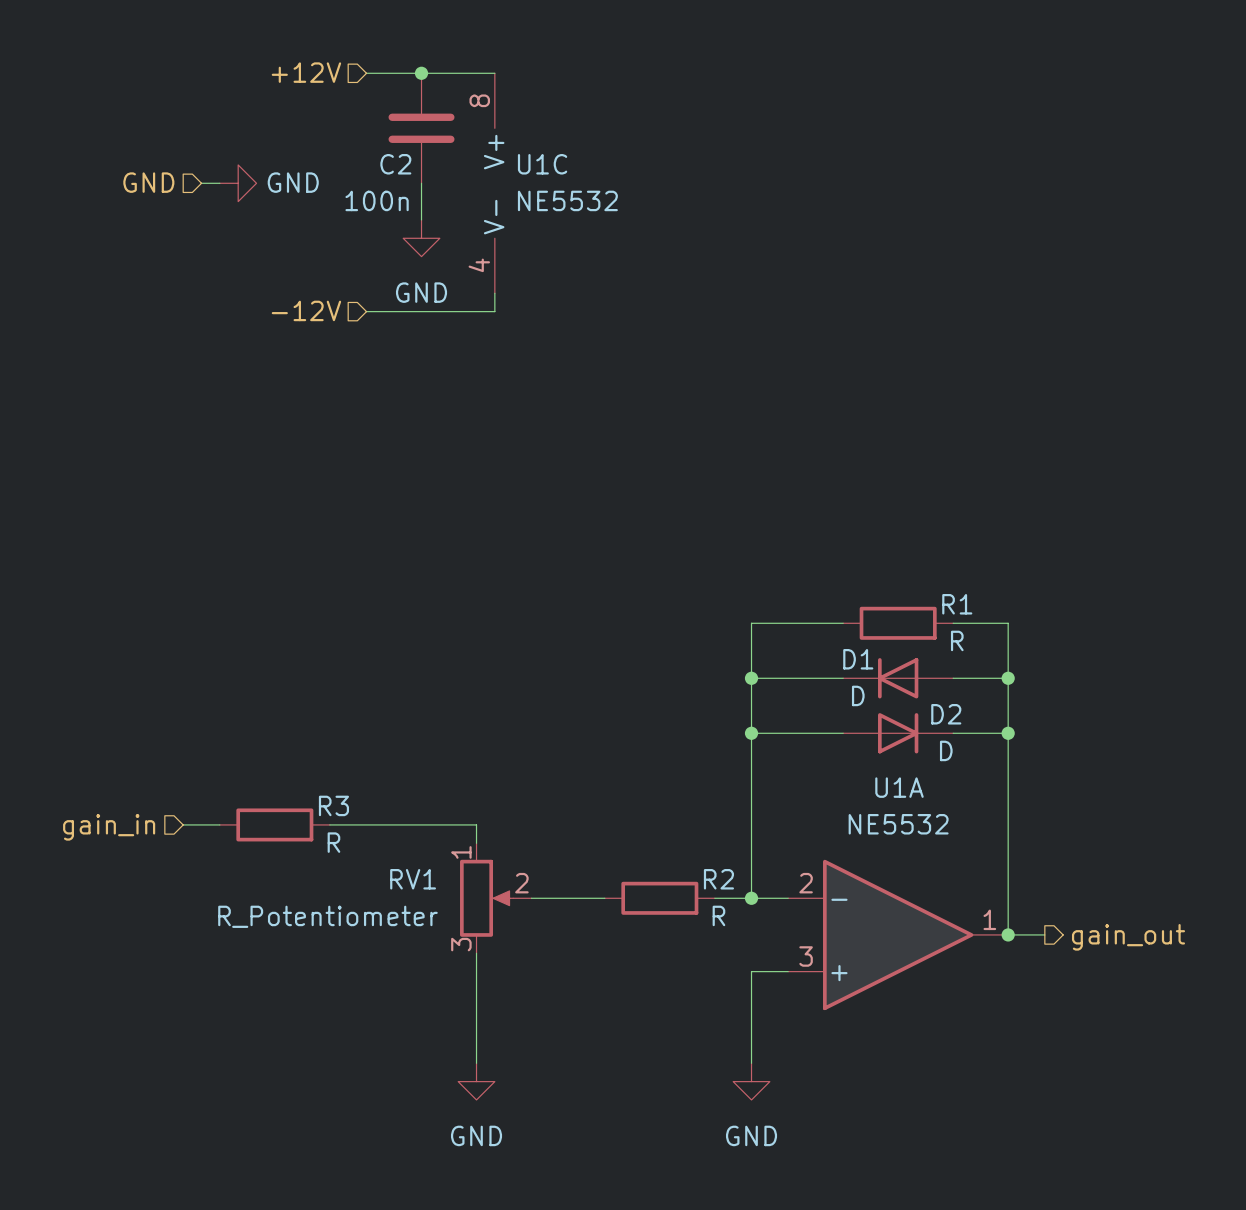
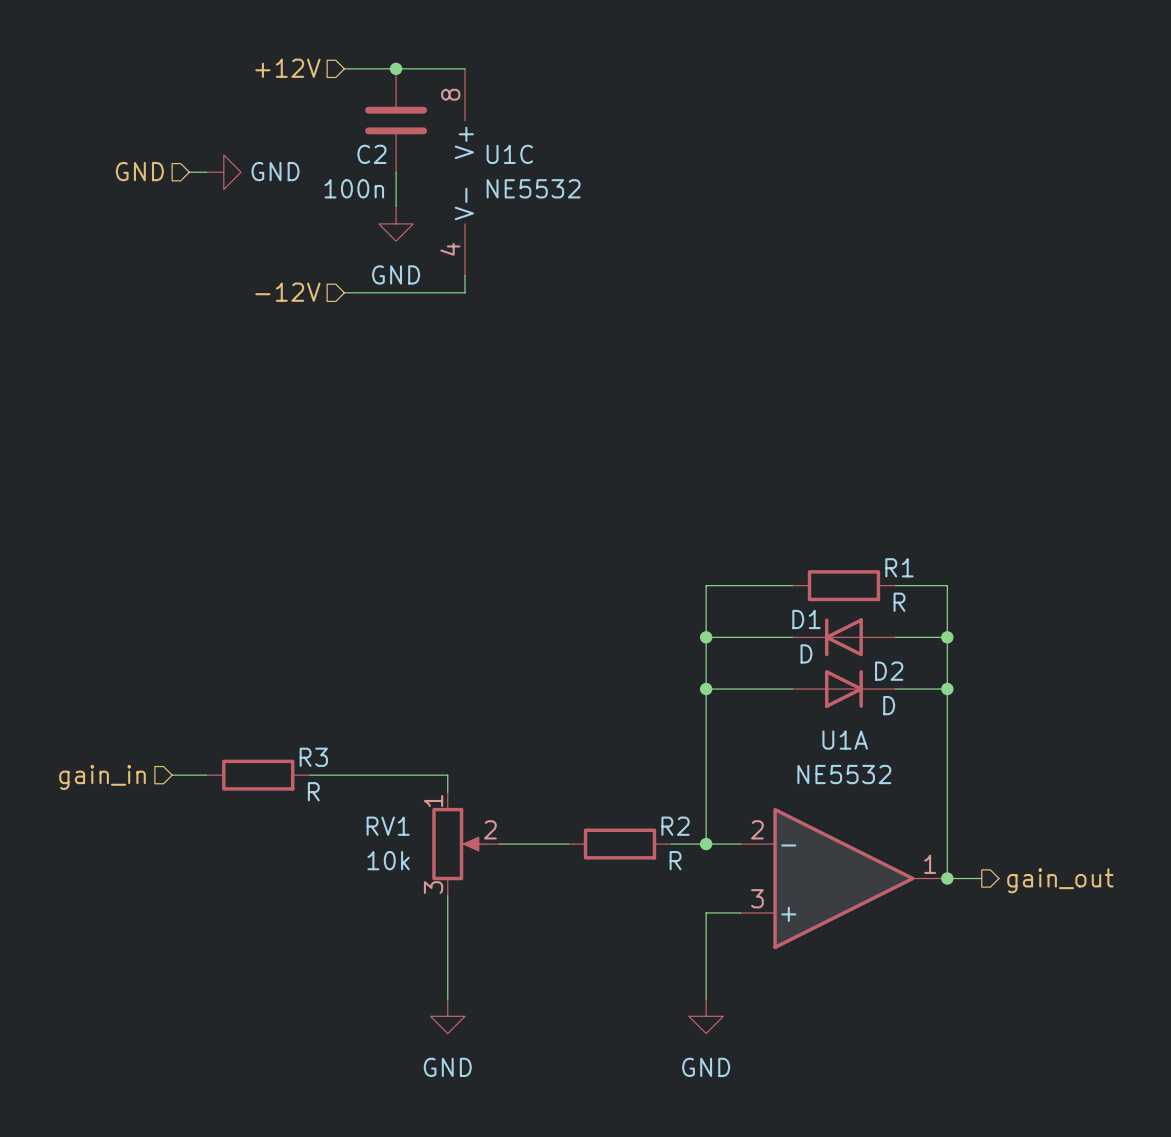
RV1 value: R_Potentiometer (327, 916) -> 10k (388, 860)

